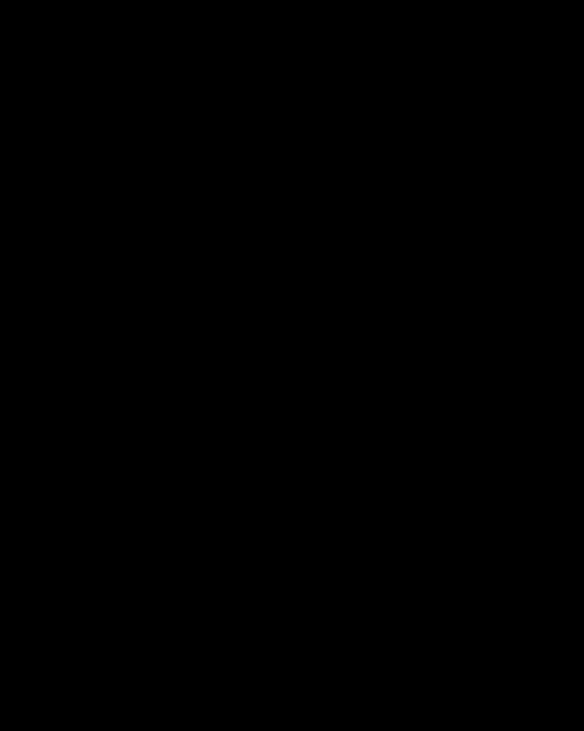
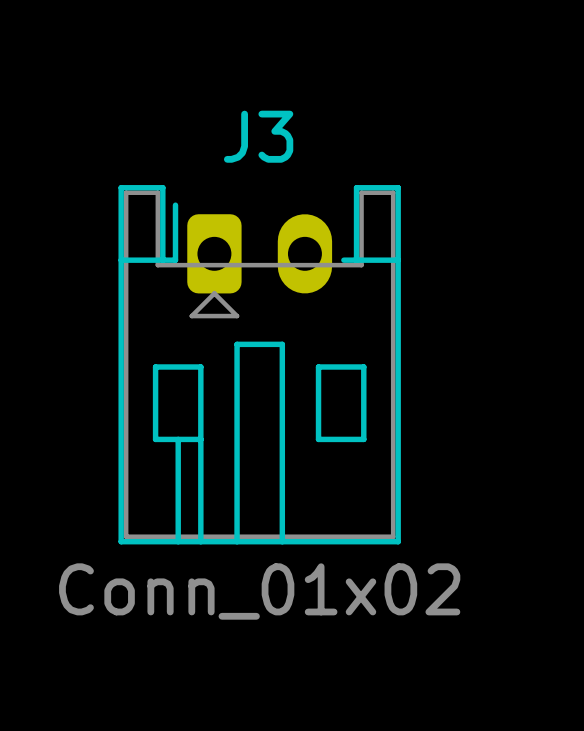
J3: none -> Conn_01x02 (259, 364)

